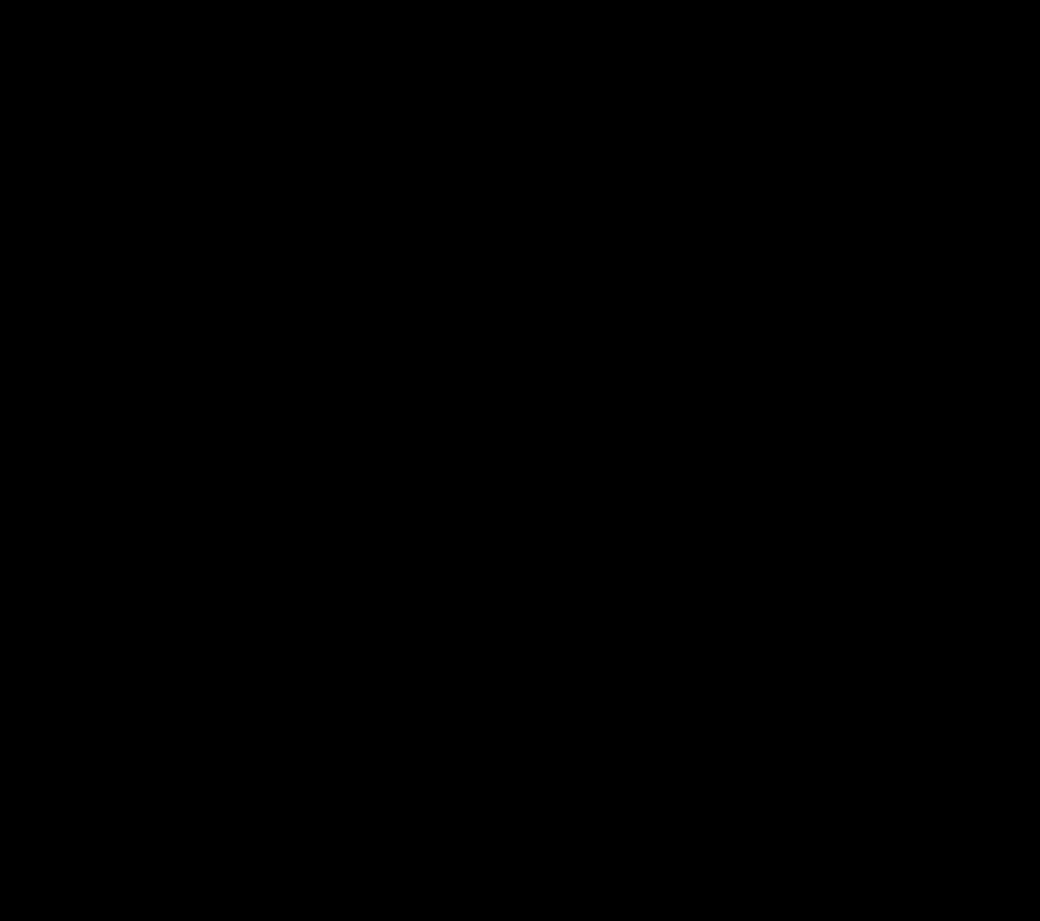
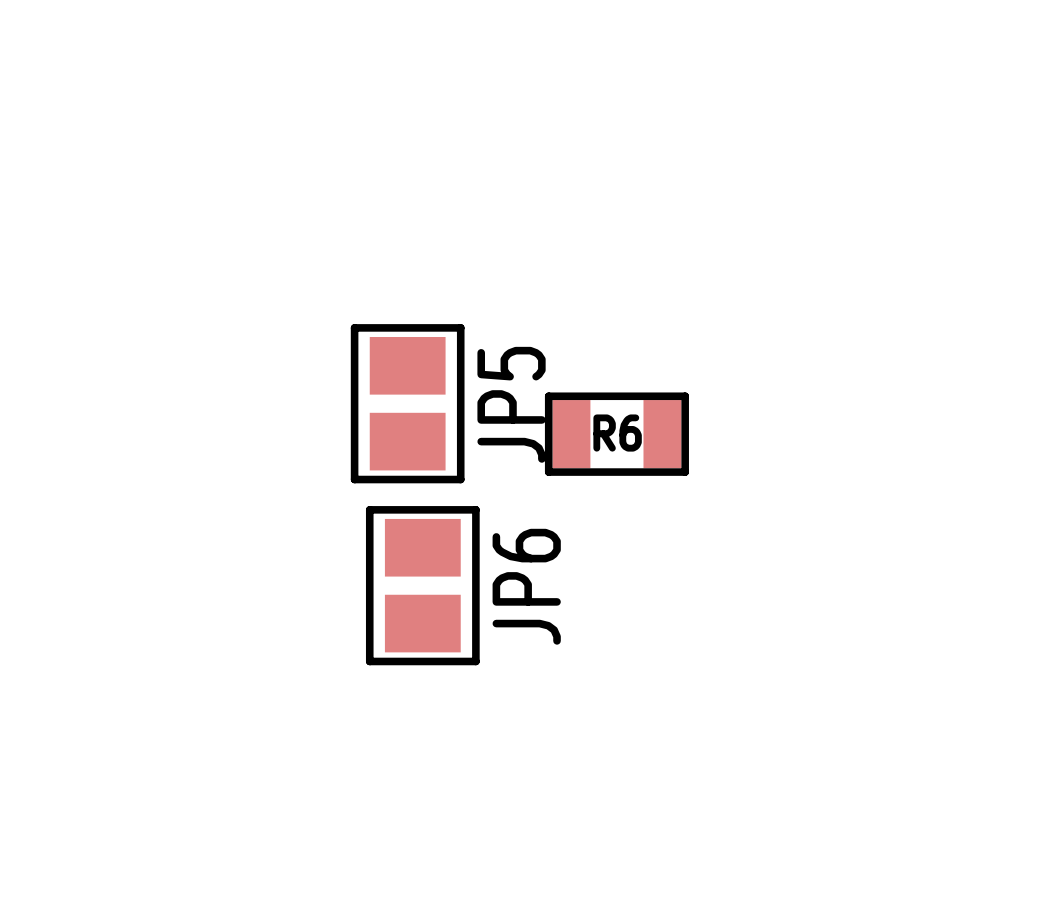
JP5: none -> (407, 403)
R6: none -> (616, 434)
JP6: none -> (422, 585)

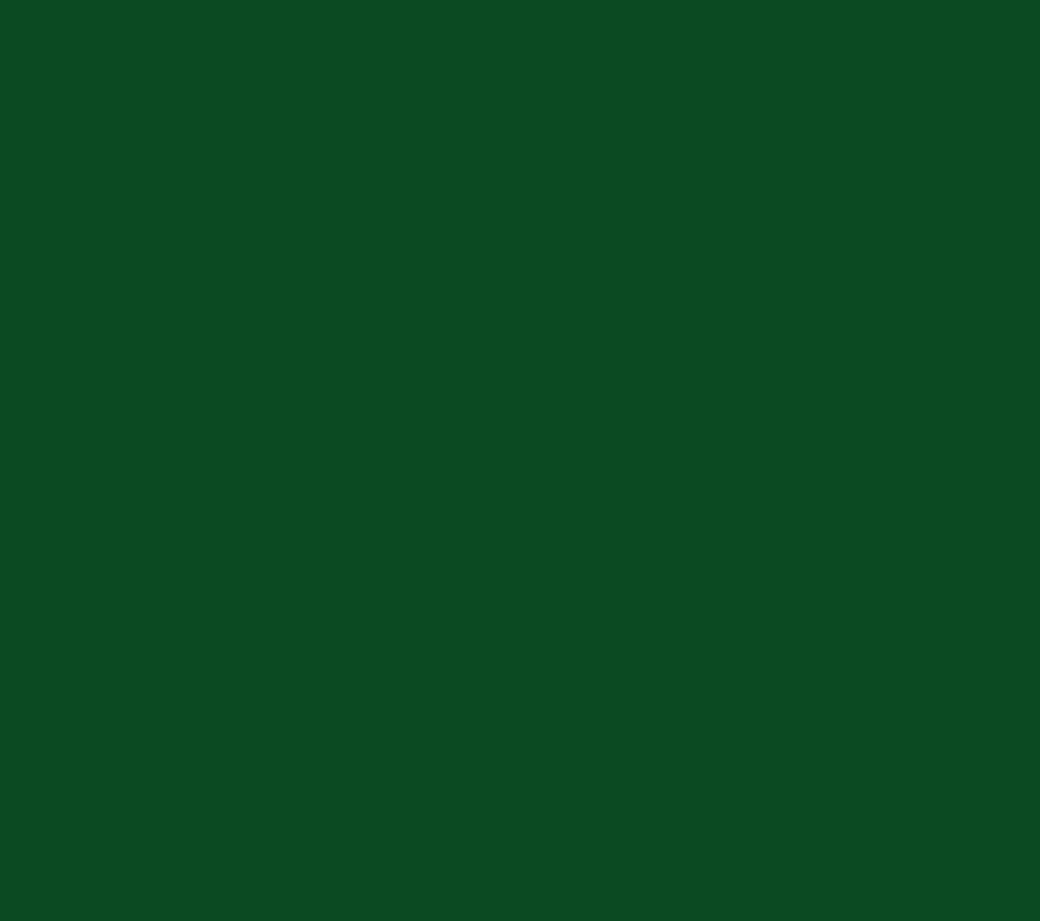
JP5: (407, 403) -> none
R6: (616, 434) -> none
JP6: (422, 585) -> none

